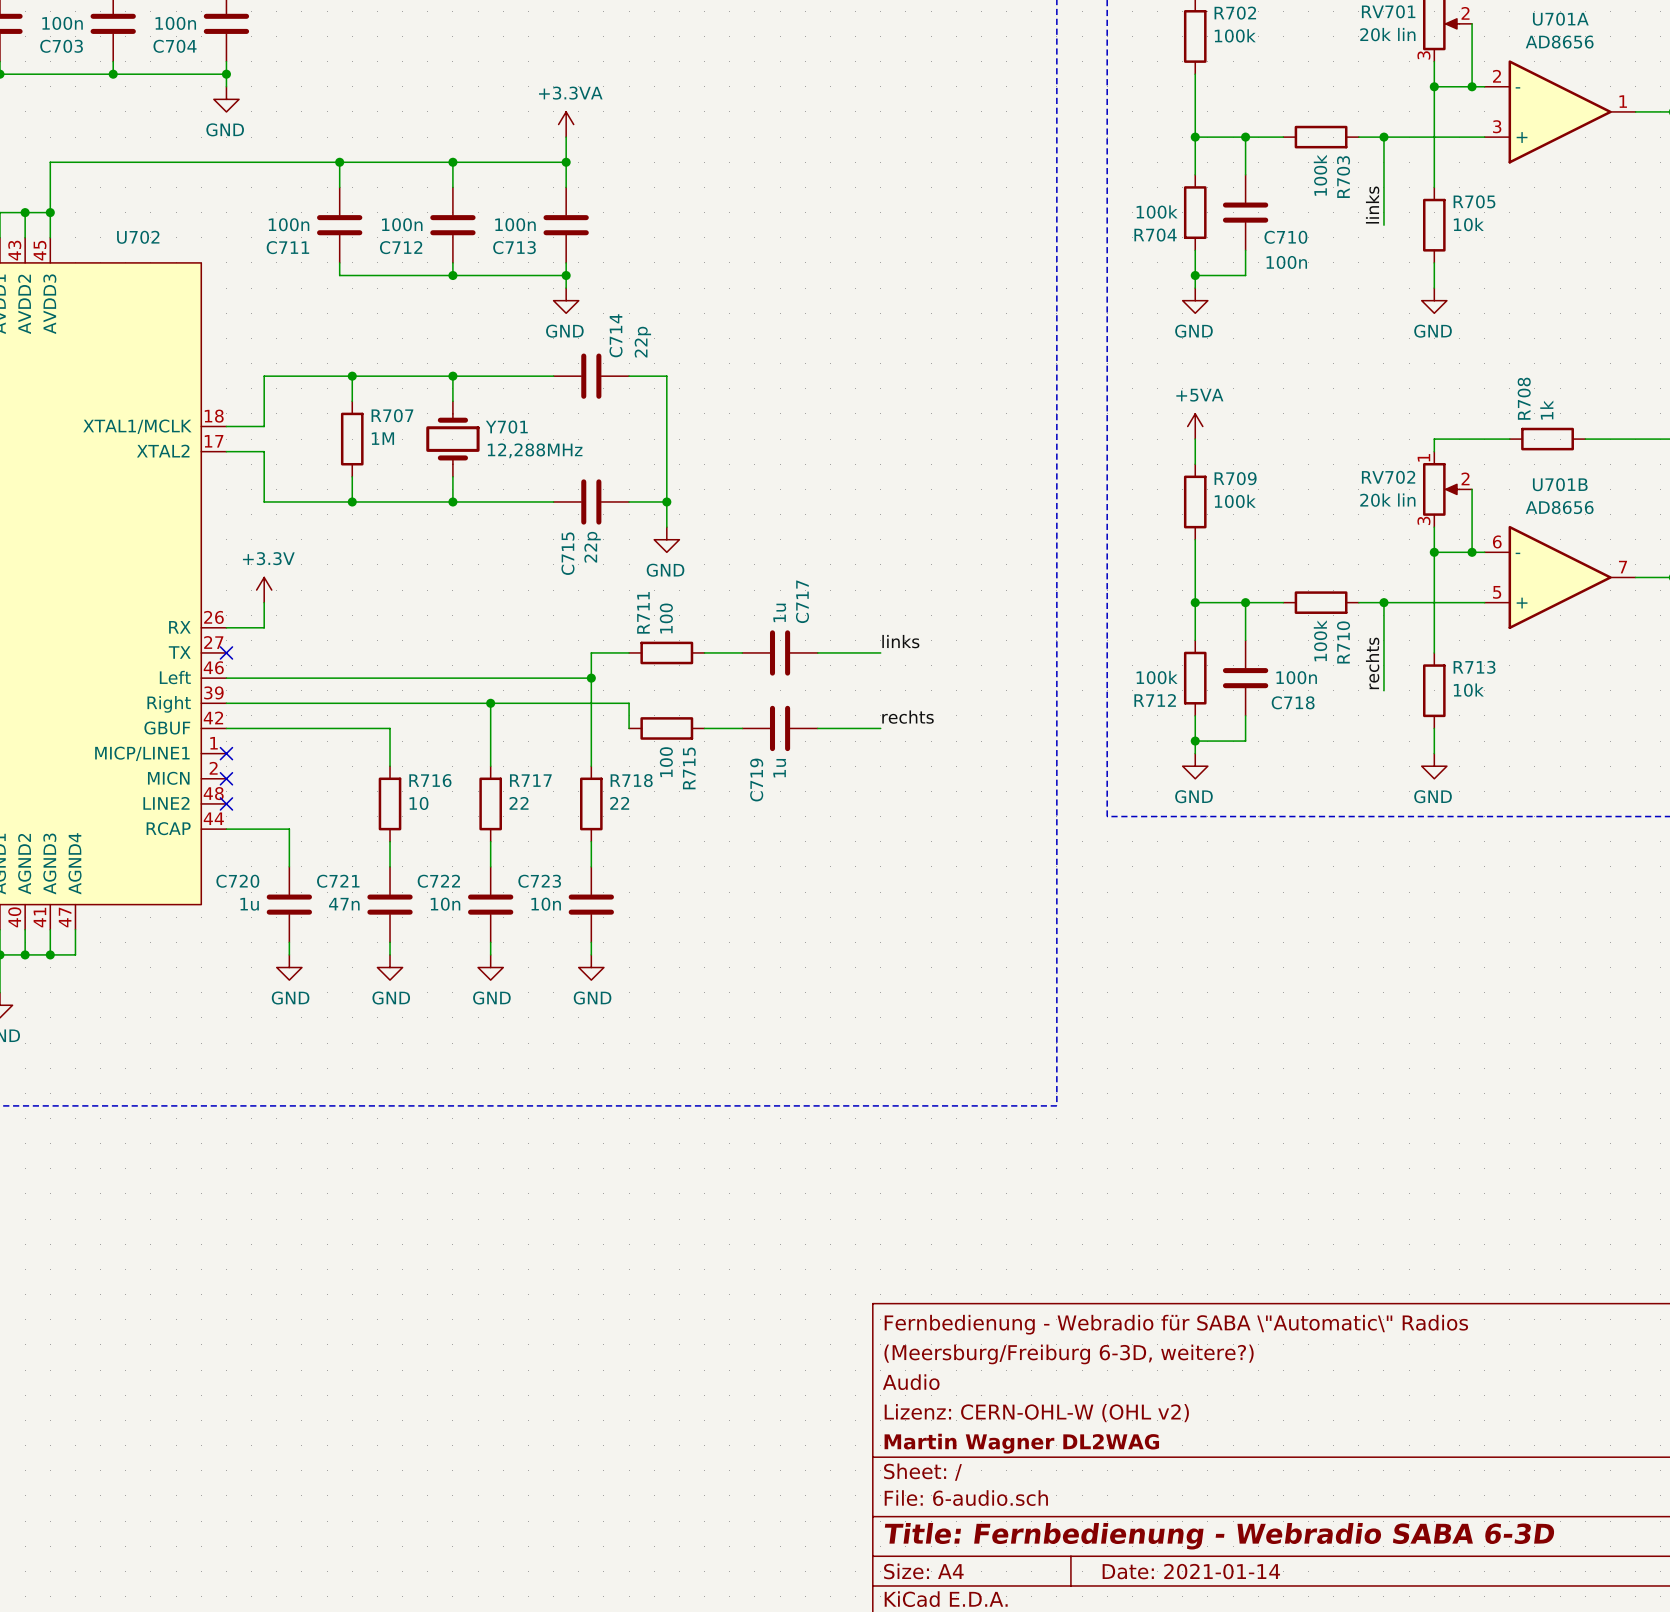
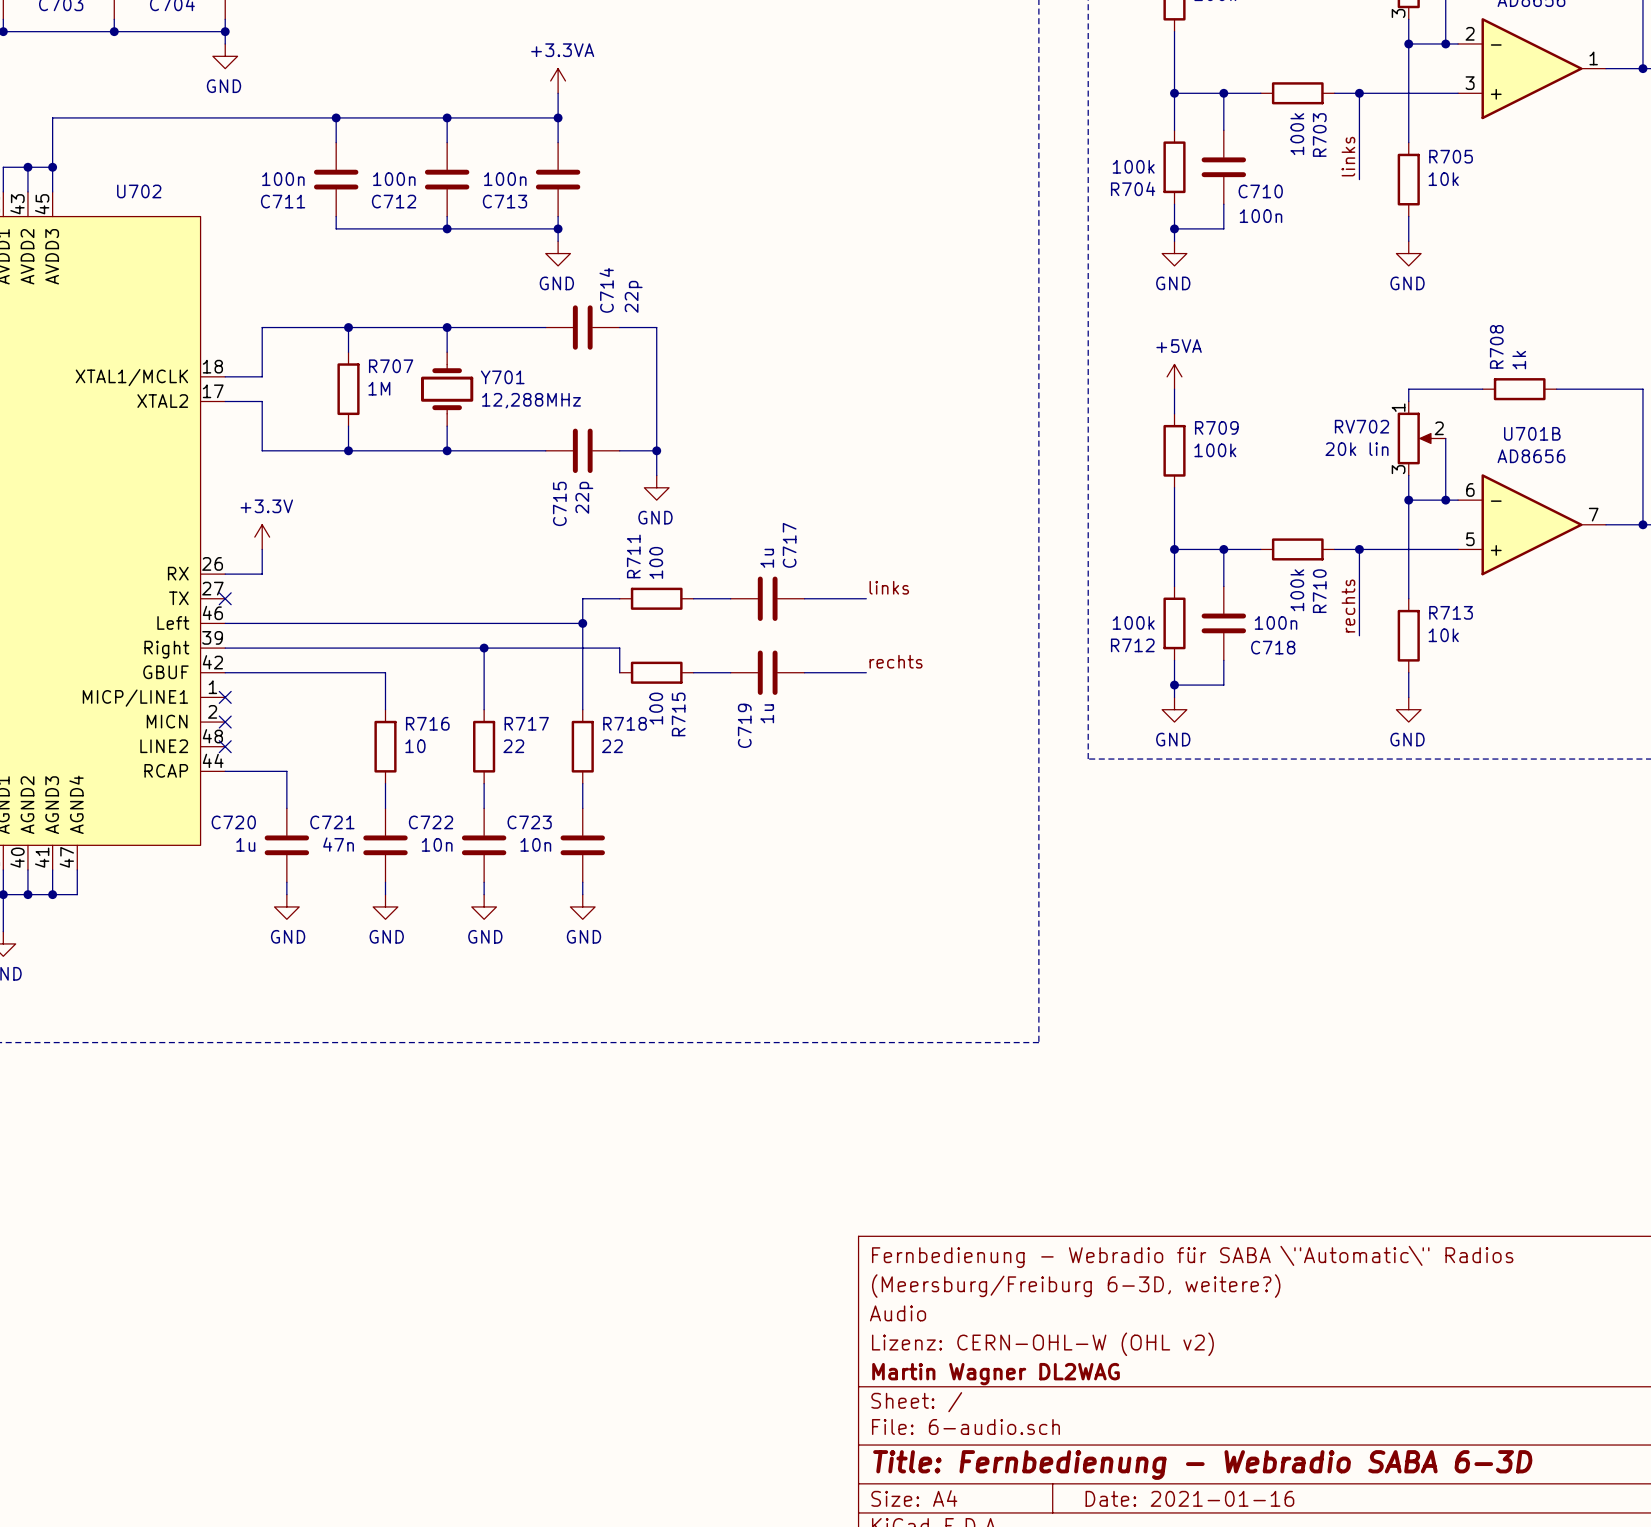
title block: Date: 2021-01-14 (1191, 1571) -> Date: 2021-01-16 (1189, 1498)

